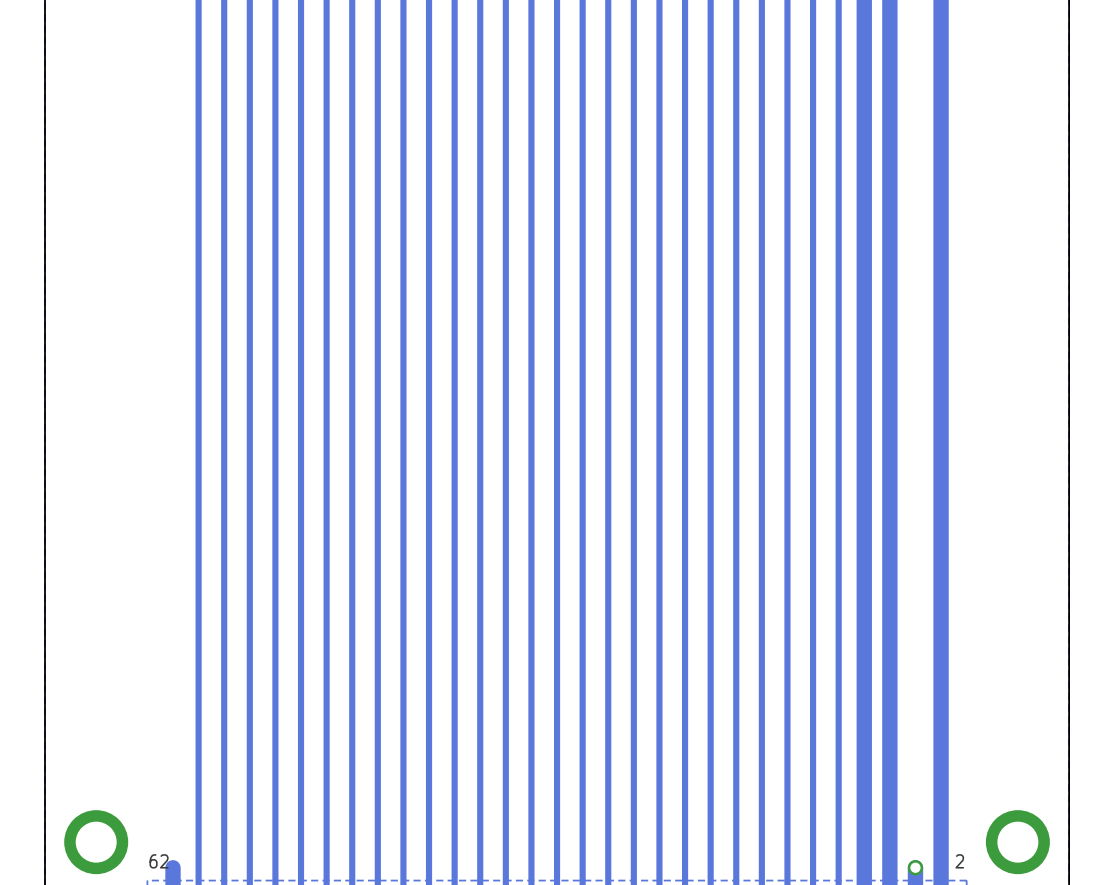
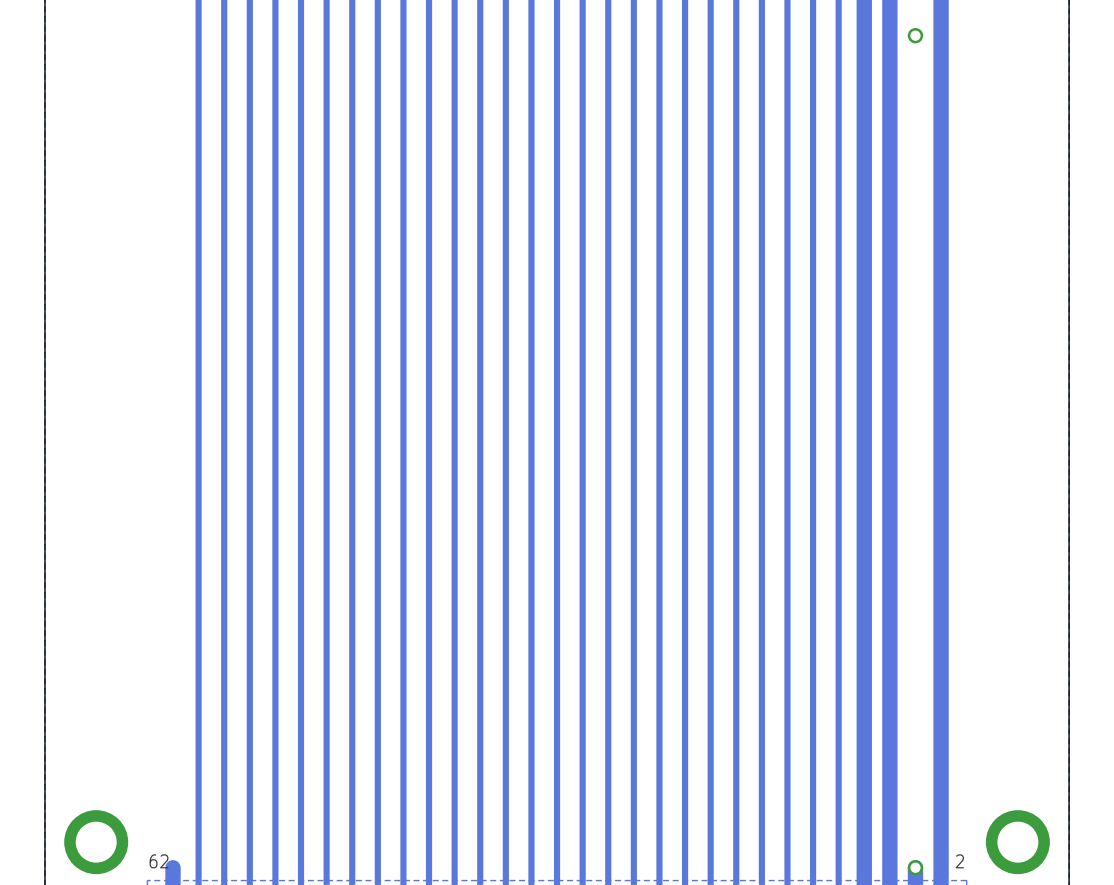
via: none -> (915, 35)

